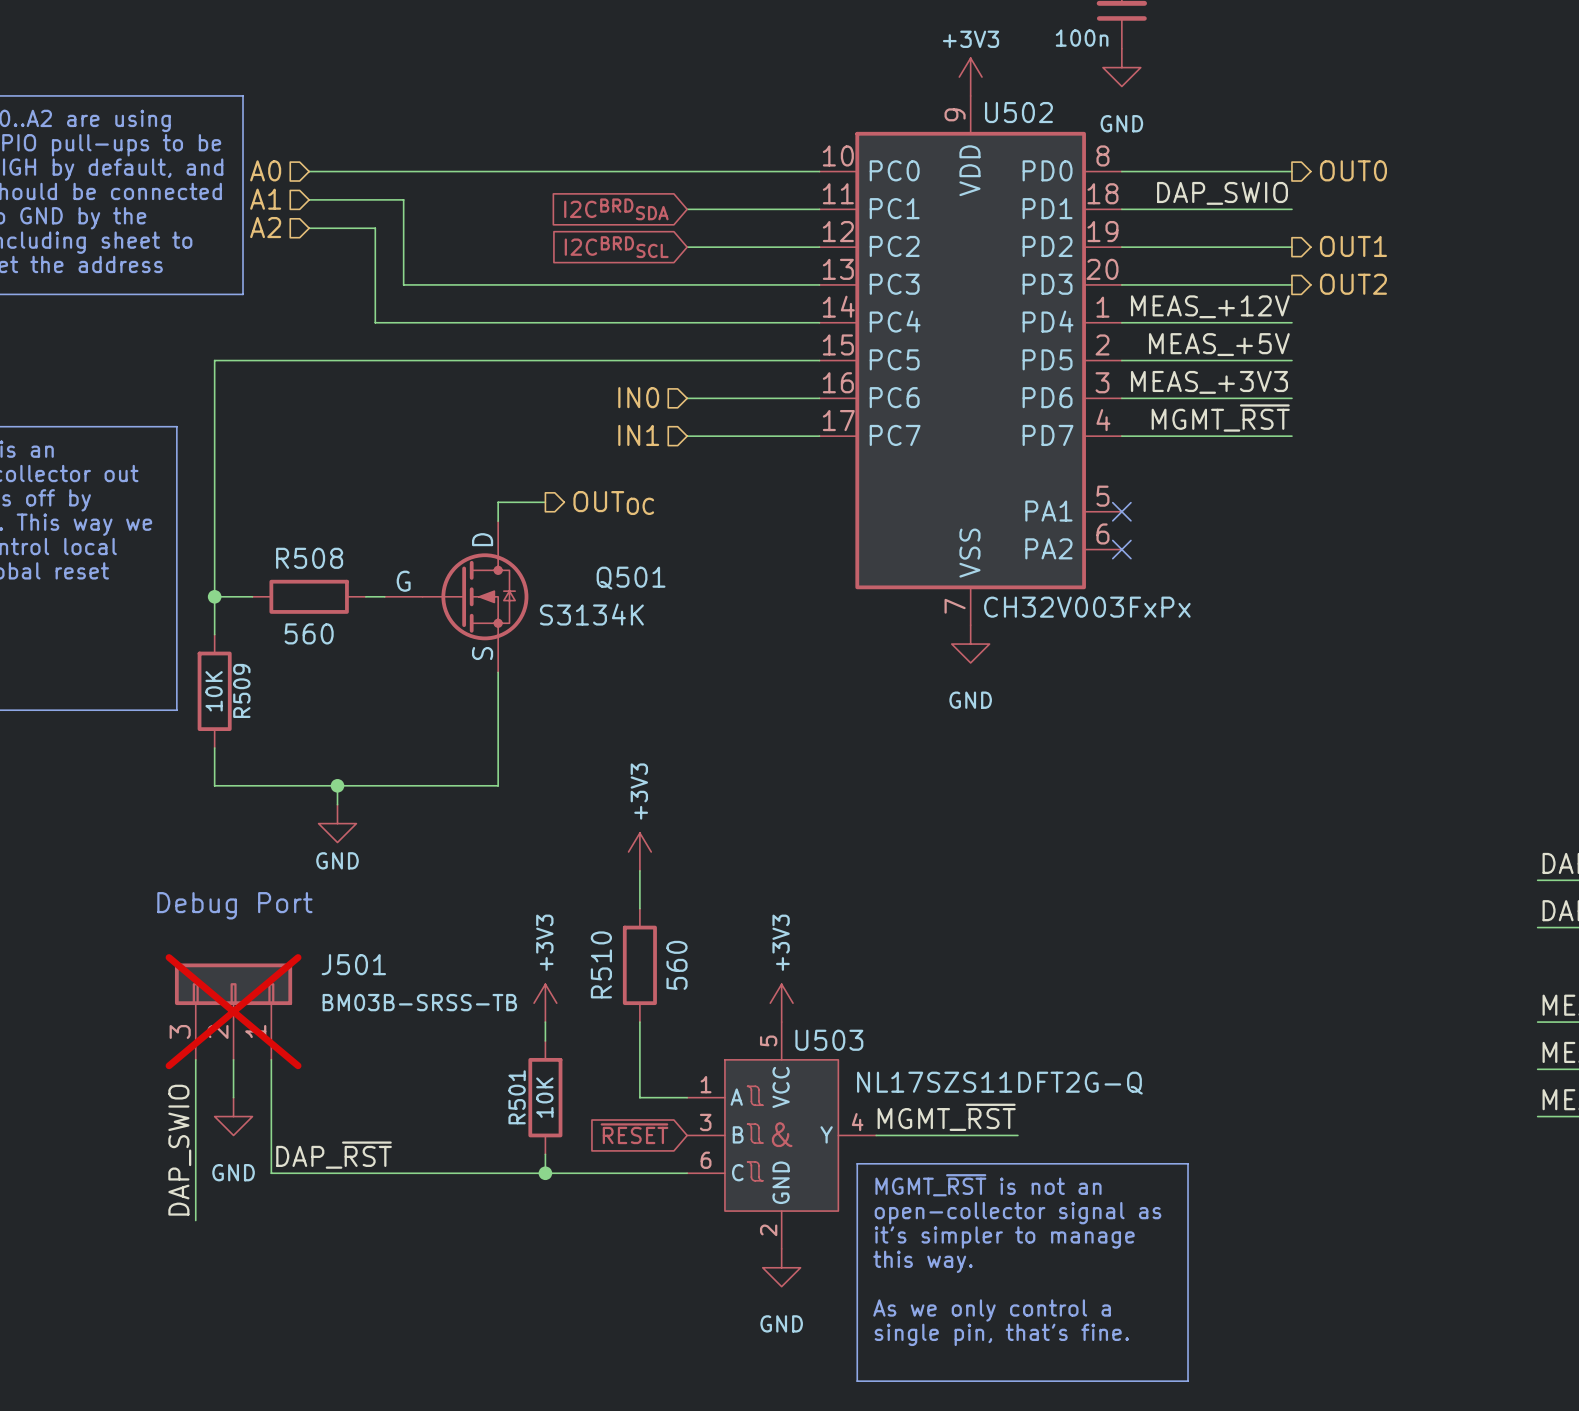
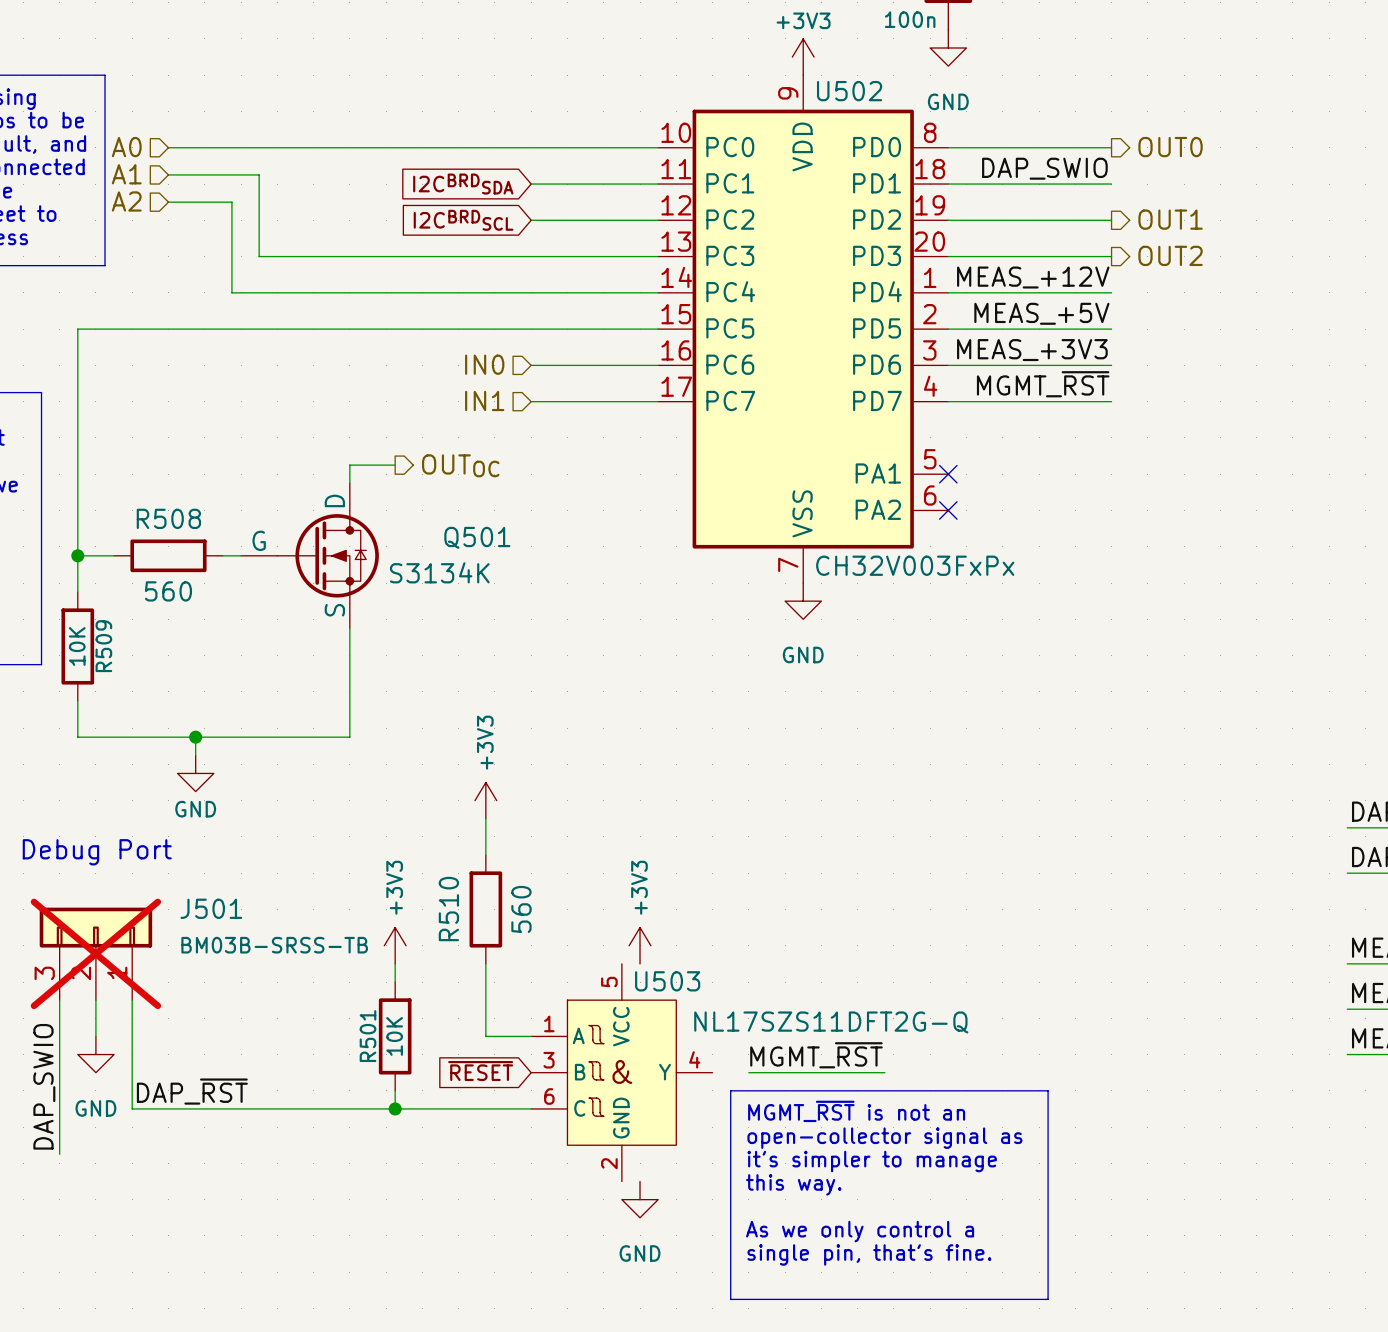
power symbol position: +3V3 (781, 1003) -> +3V3 (640, 945)
label position: MGMT_~{RST} (946, 1117) -> MGMT_~{RST} (816, 1055)
wire: (876, 1135) (913, 1135) -> (848, 1072) (884, 1072)
line: (857, 1163) (1188, 1163) (1188, 1381) (857, 1381) (857, 1163) -> (730, 1090) (1048, 1090) (1048, 1299) (730, 1299) (730, 1090)
text position: MGMT_~{RST} is not an (988, 1185) -> MGMT_~{RST} is not an (856, 1111)
text position: open-collector signal as (1018, 1213) -> open-collector signal as (884, 1138)
text position: it's simpler to manage (1004, 1237) -> it's simpler to manage (872, 1161)
text position: this way. (922, 1261) -> this way. (793, 1184)
power symbol position: GND (781, 1267) -> GND (640, 1199)
text position: As we only control a (992, 1310) -> As we only control a (860, 1231)
text position: single pin, that's fine. (1001, 1334) -> single pin, that's fine. (869, 1254)

